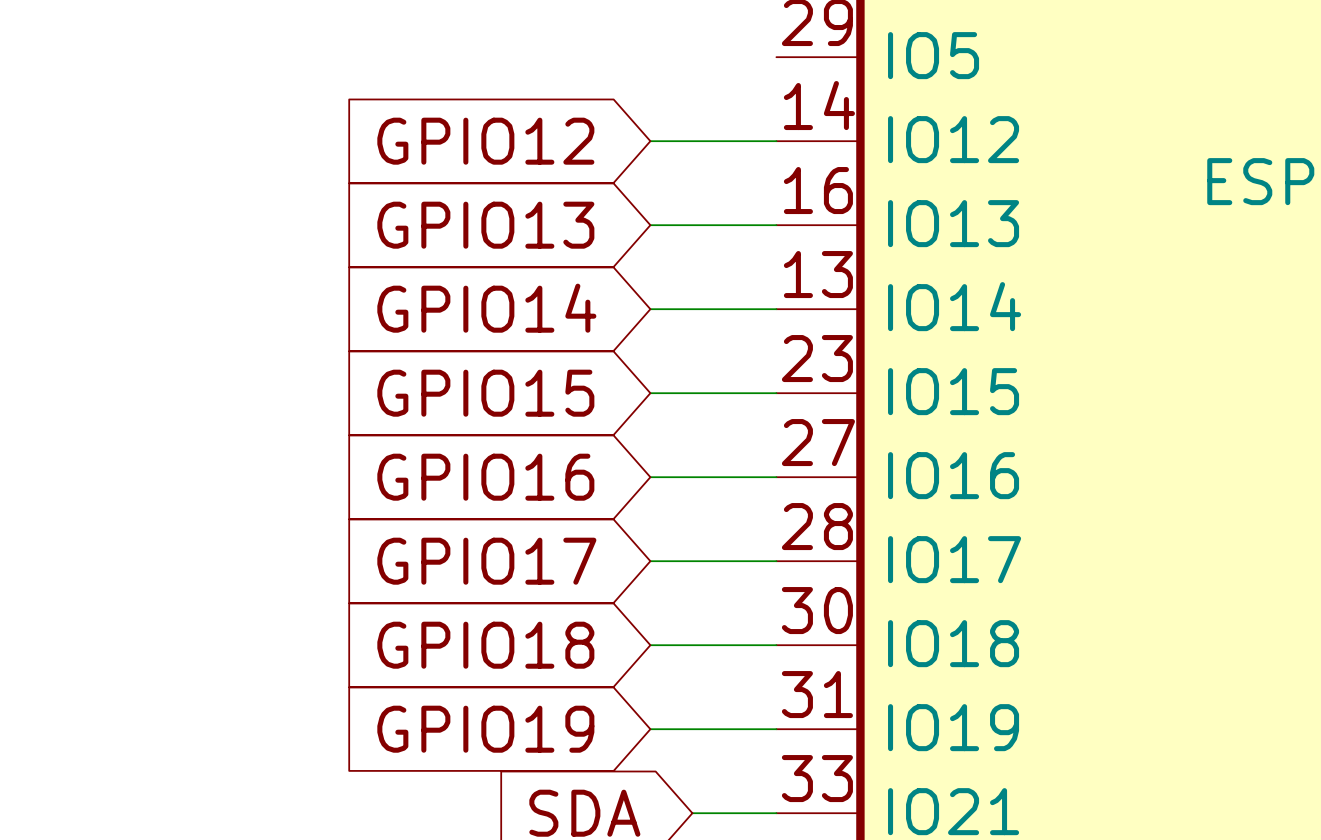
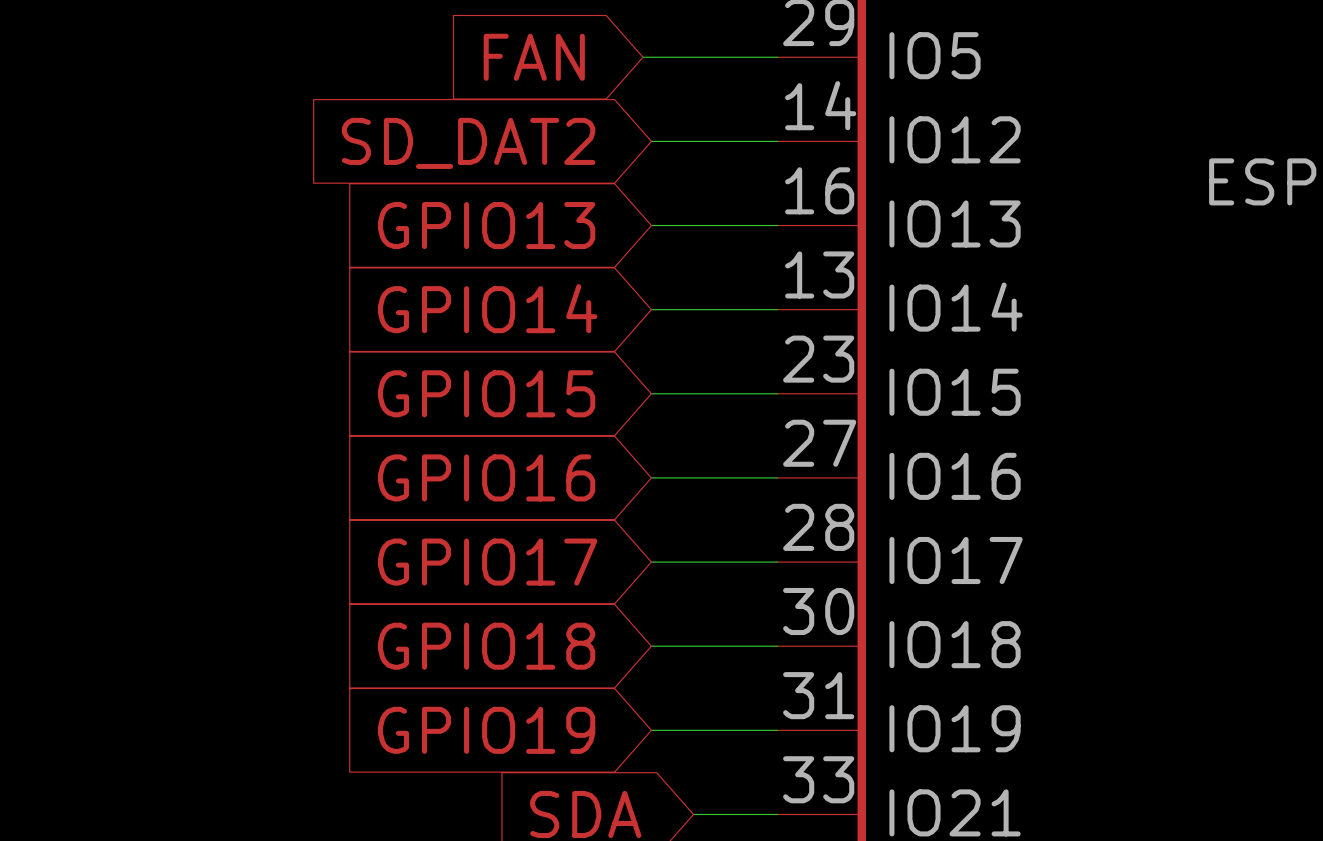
global label: none -> FAN (534, 57)
wire: none -> (643, 57) (777, 57)
global label: GPIO12 (485, 141) -> SD_DAT2 (468, 143)

